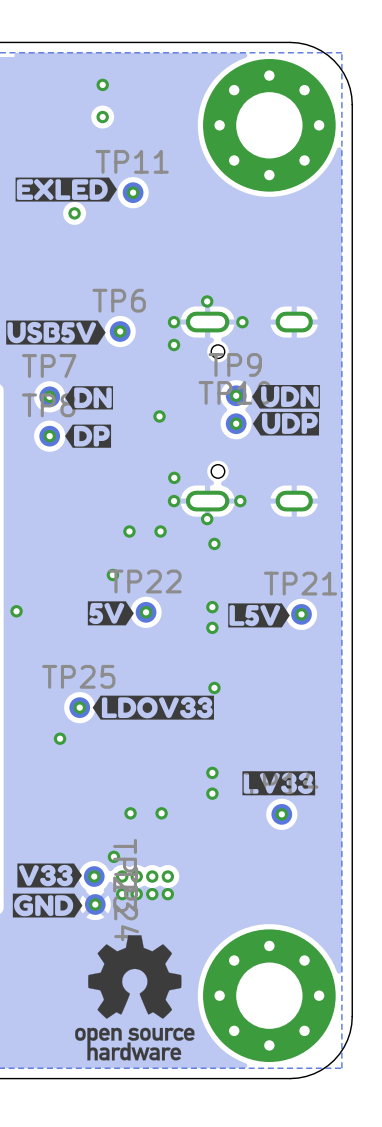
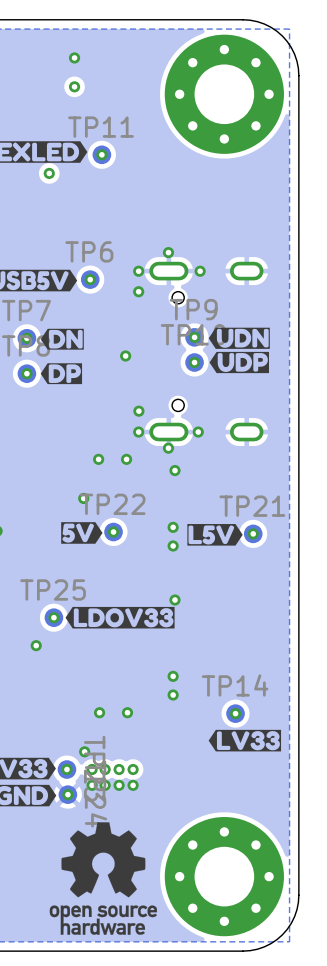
drawing: [242, 771, 315, 796] -> none
drawing: none -> [208, 729, 282, 752]

